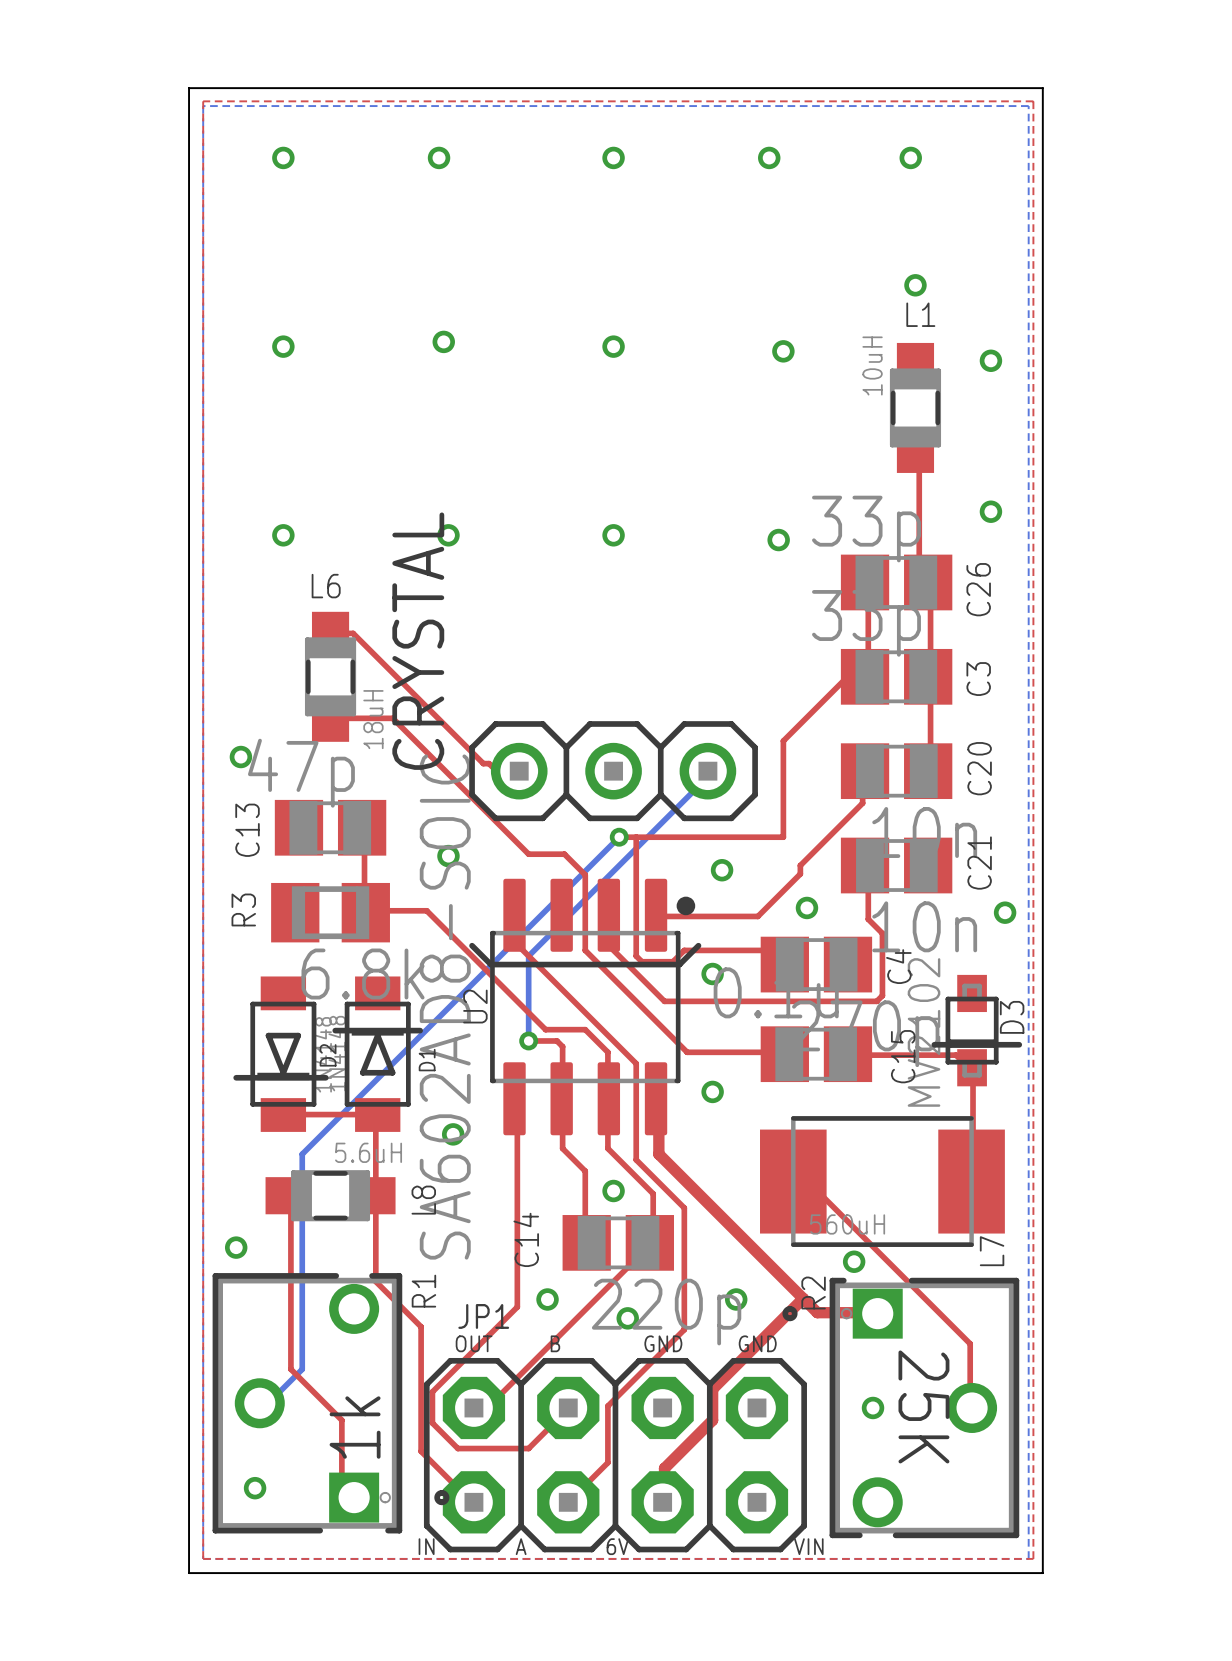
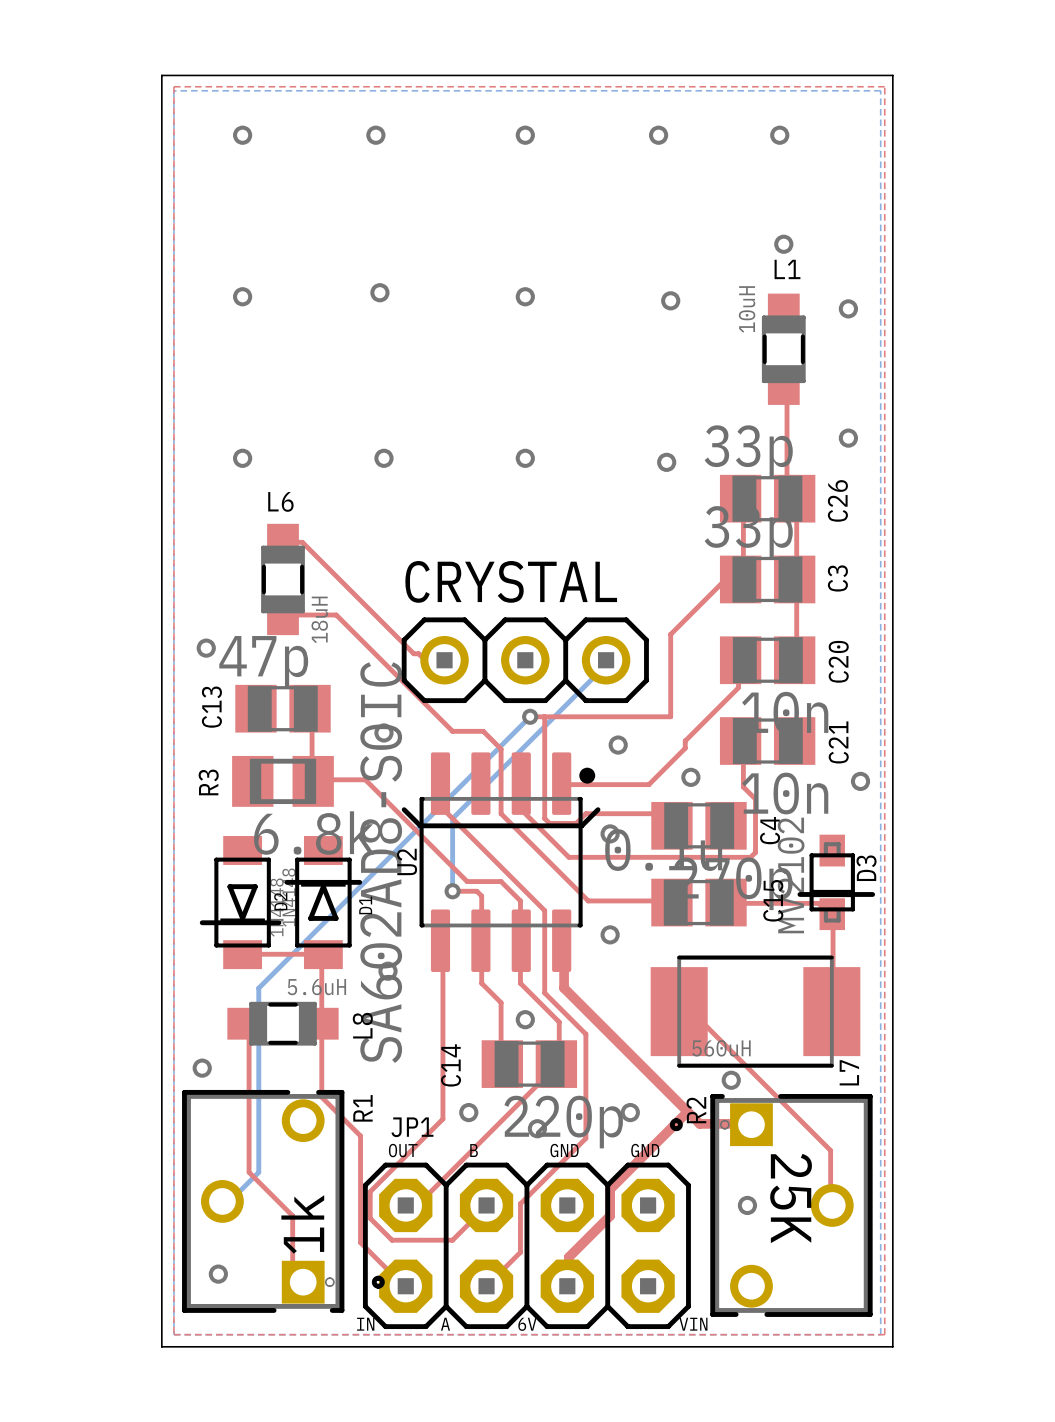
CRYSTAL name rotation: 0° (418, 641) -> 90° clockwise (511, 581)

